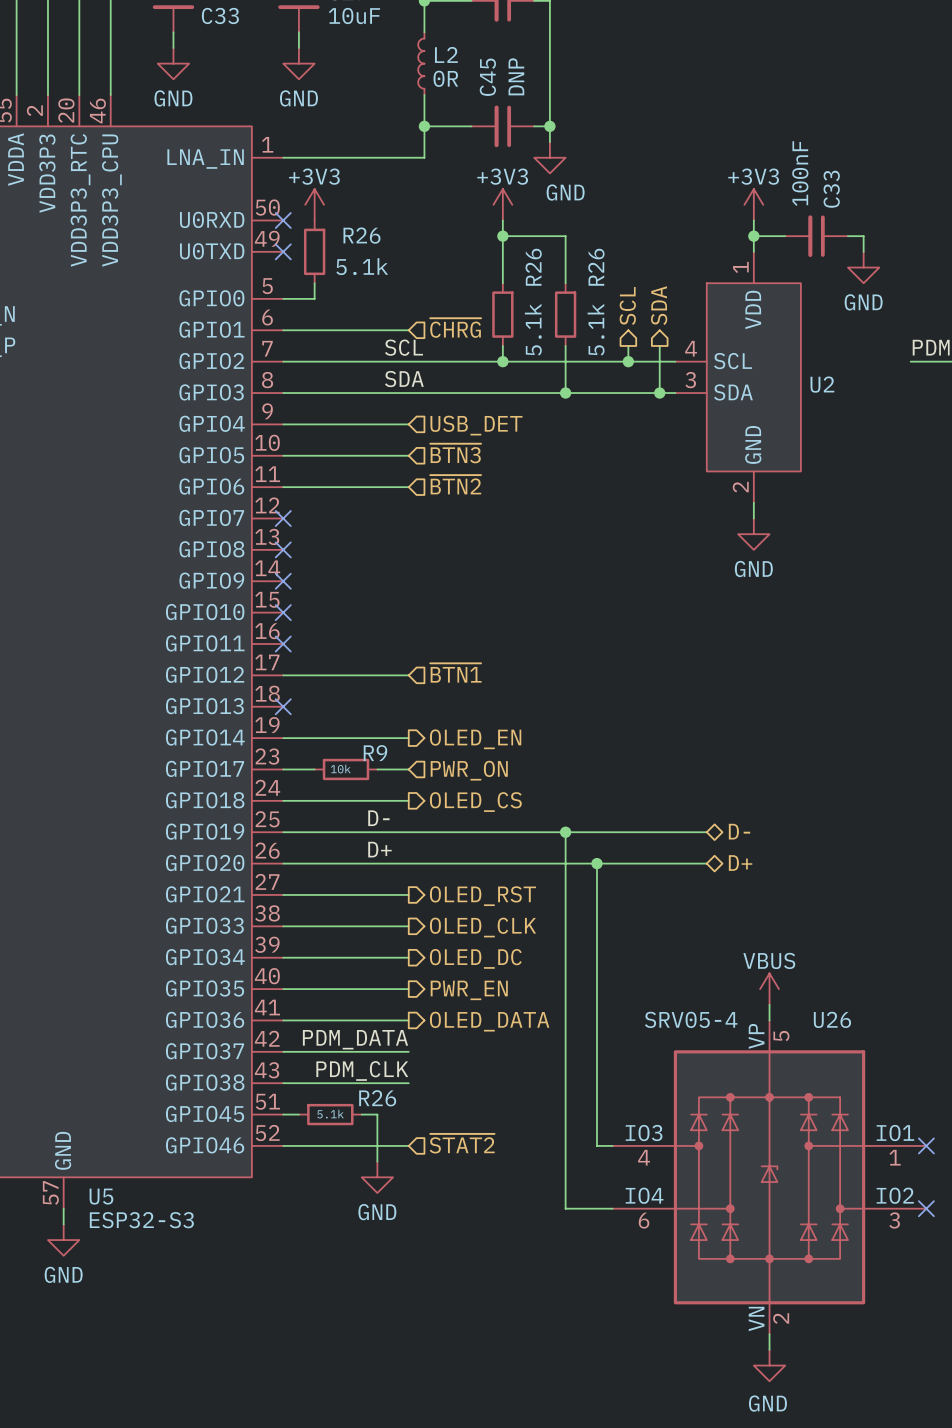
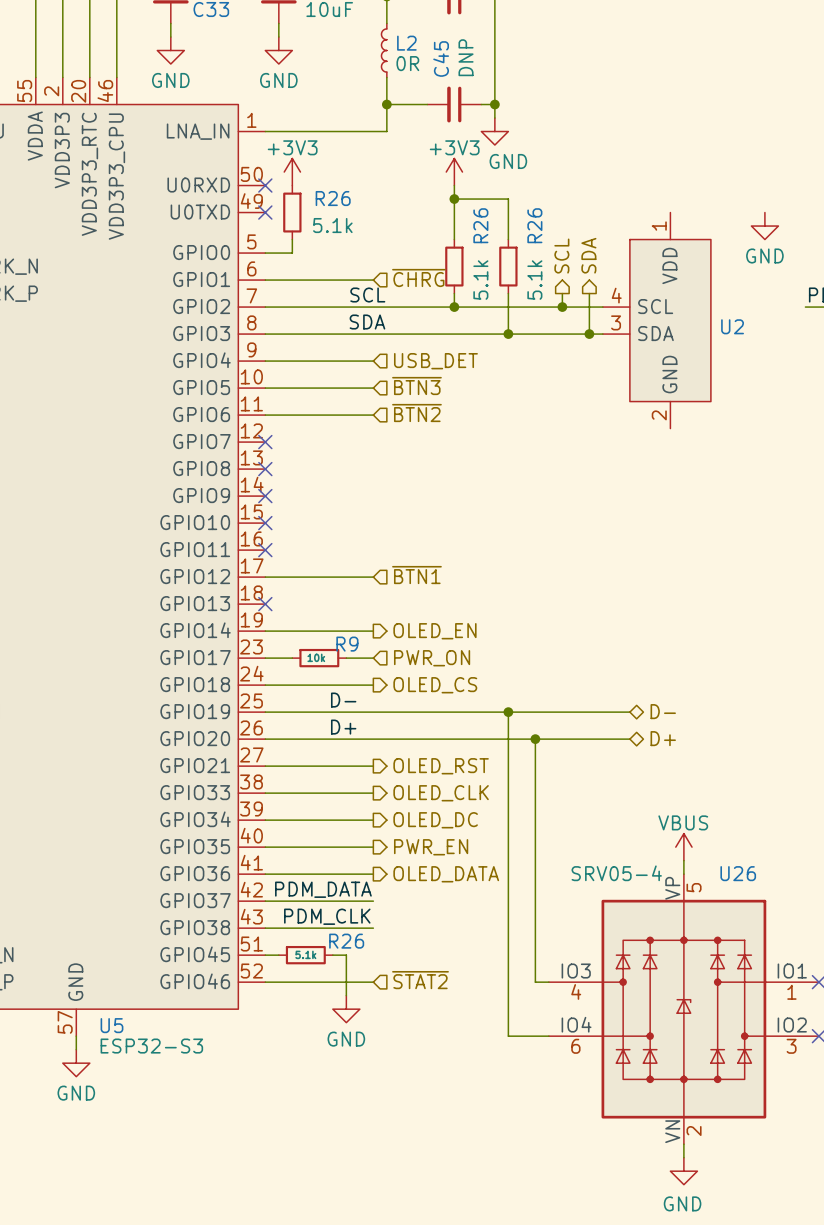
power symbol: +3V3 (753, 204) -> none
wire: (753, 220) (753, 251) -> none
wire: (753, 236) (785, 236) -> none
junction: (753, 236) -> none
C33: 100nF (816, 236) -> none
wire: (847, 236) (863, 236) (863, 251) -> none
wire: (753, 502) (753, 518) -> none
power symbol: GND (753, 534) -> none

